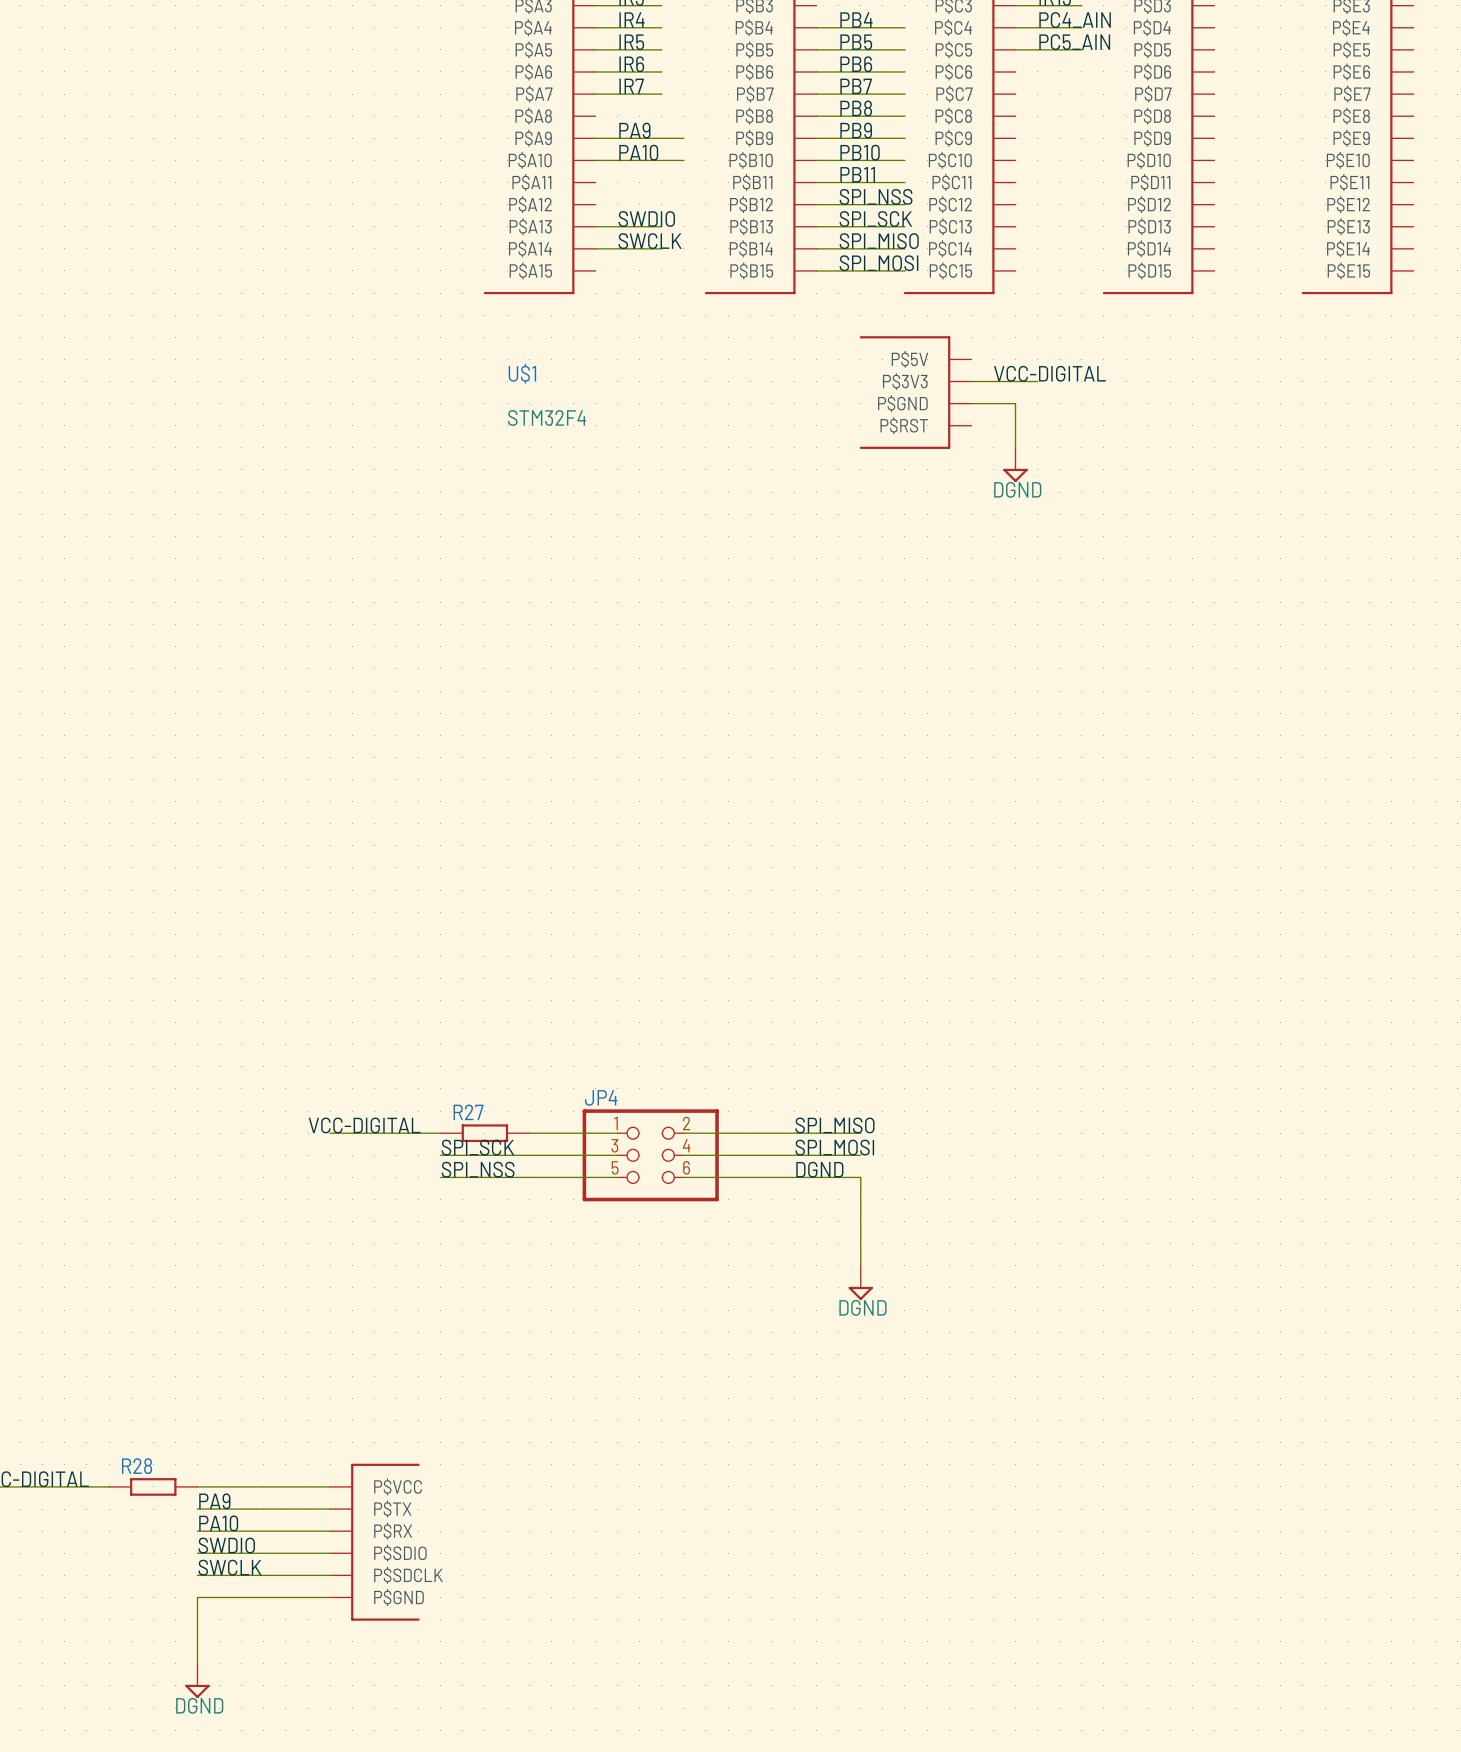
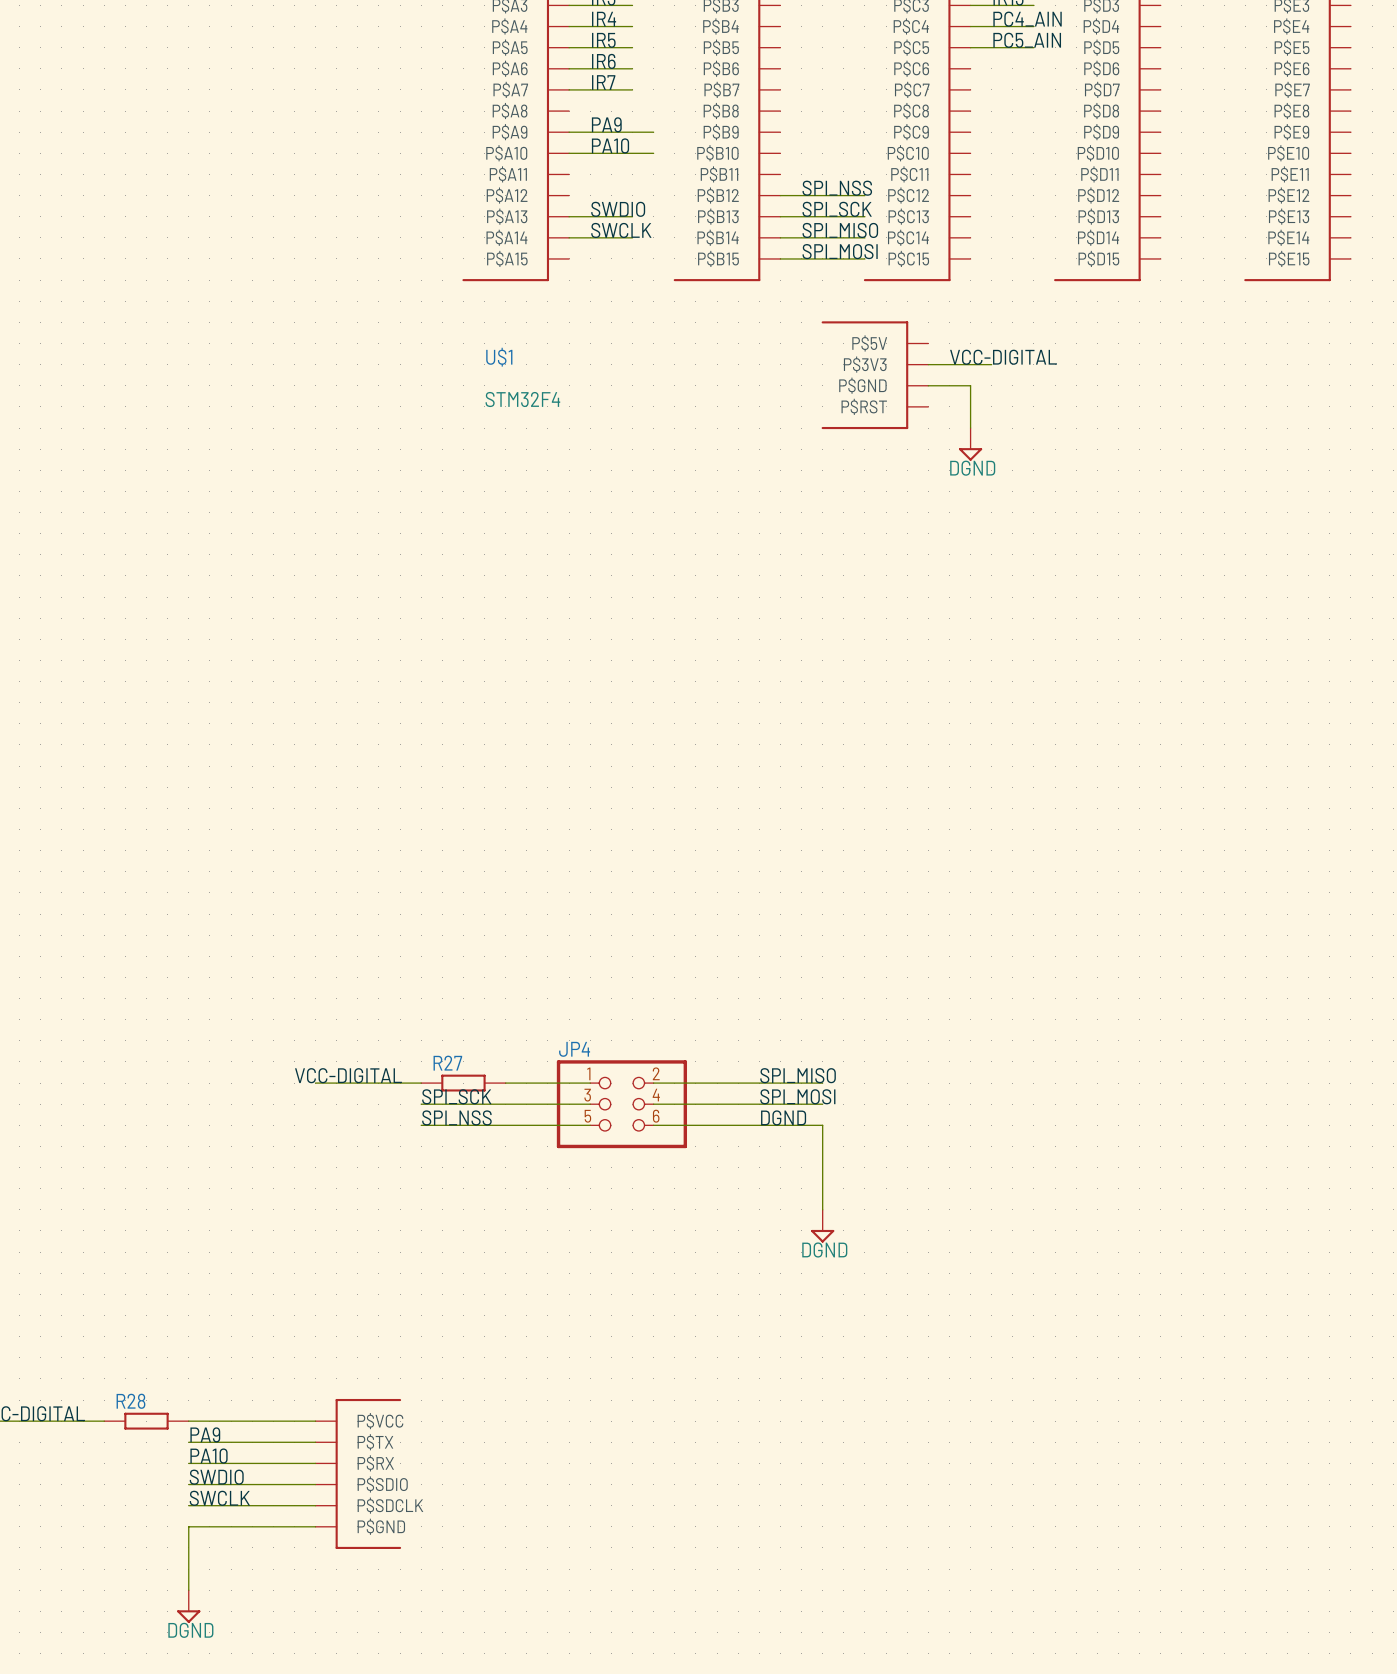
label: PB4 (856, 20) -> none
wire: (816, 27) (904, 27) -> none
label: PB5 (856, 42) -> none
wire: (816, 49) (904, 49) -> none
label: PB6 (856, 64) -> none
wire: (816, 71) (904, 71) -> none
label: PB7 (856, 86) -> none
wire: (816, 94) (904, 94) -> none
label: PB8 (856, 108) -> none
wire: (816, 116) (904, 116) -> none
label: PB9 (856, 130) -> none
wire: (816, 138) (904, 138) -> none
label: PB10 (860, 152) -> none
wire: (816, 160) (904, 160) -> none
label: PB11 (857, 174) -> none
wire: (816, 182) (904, 182) -> none

